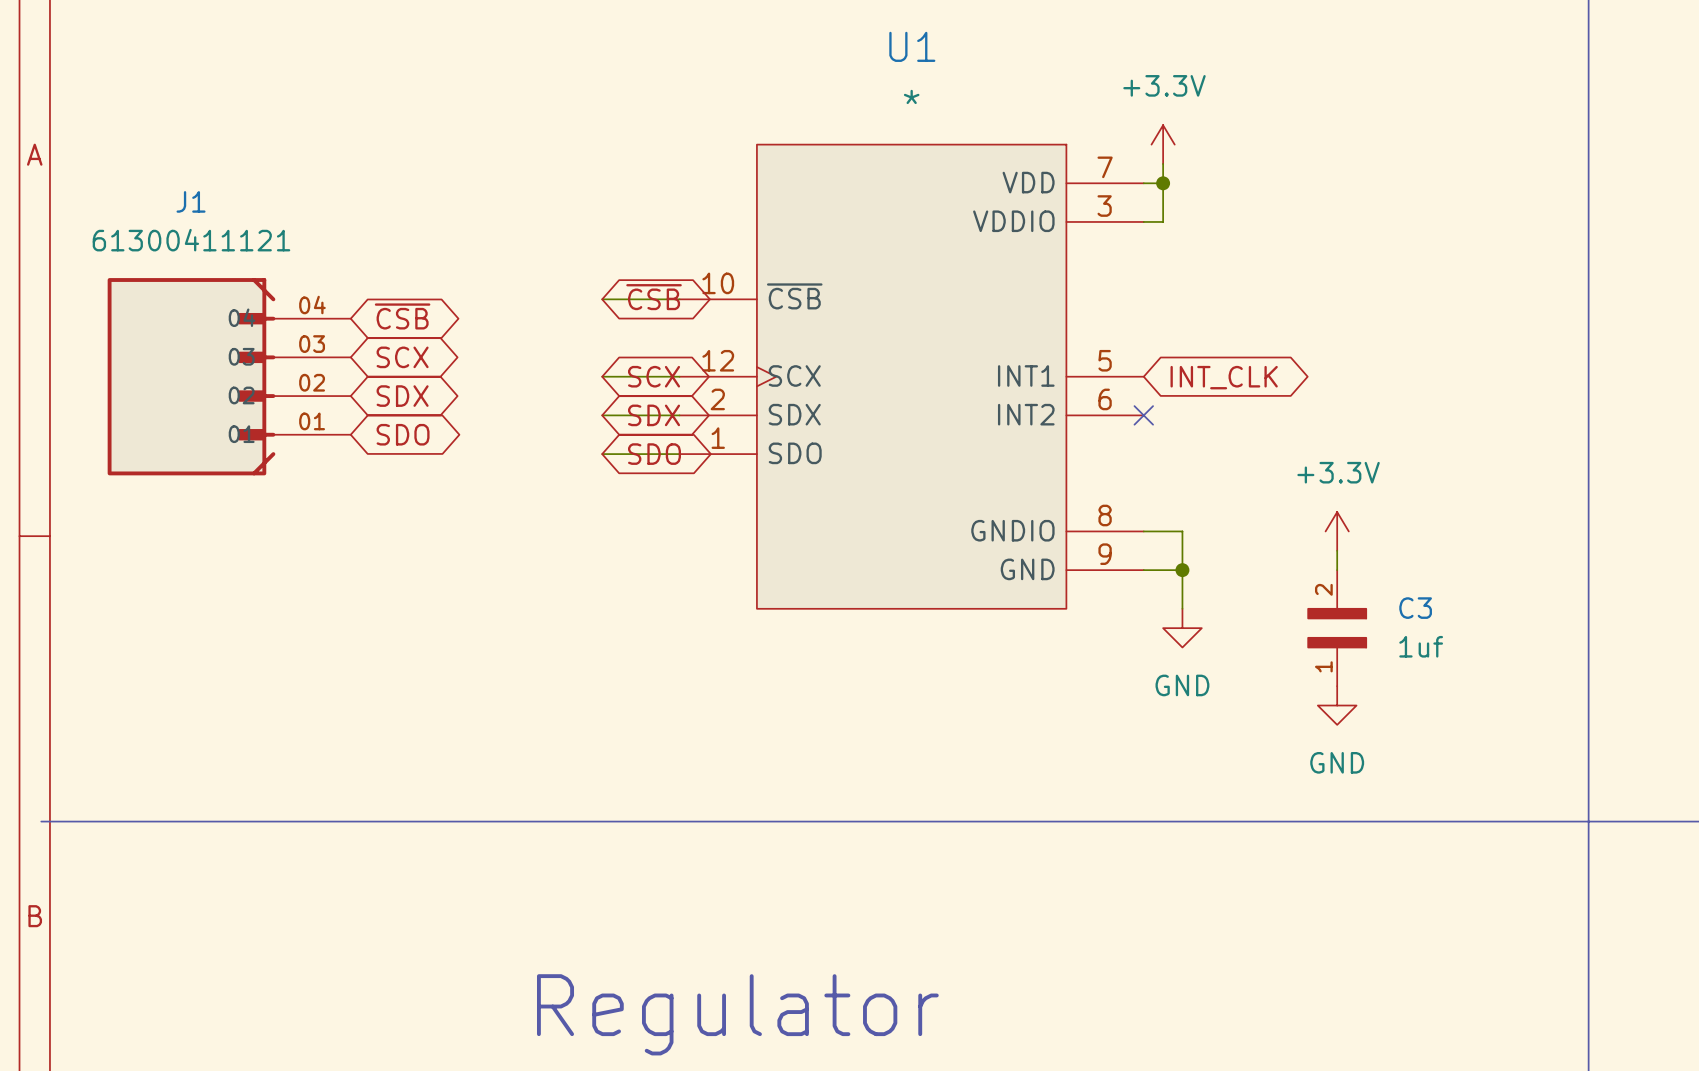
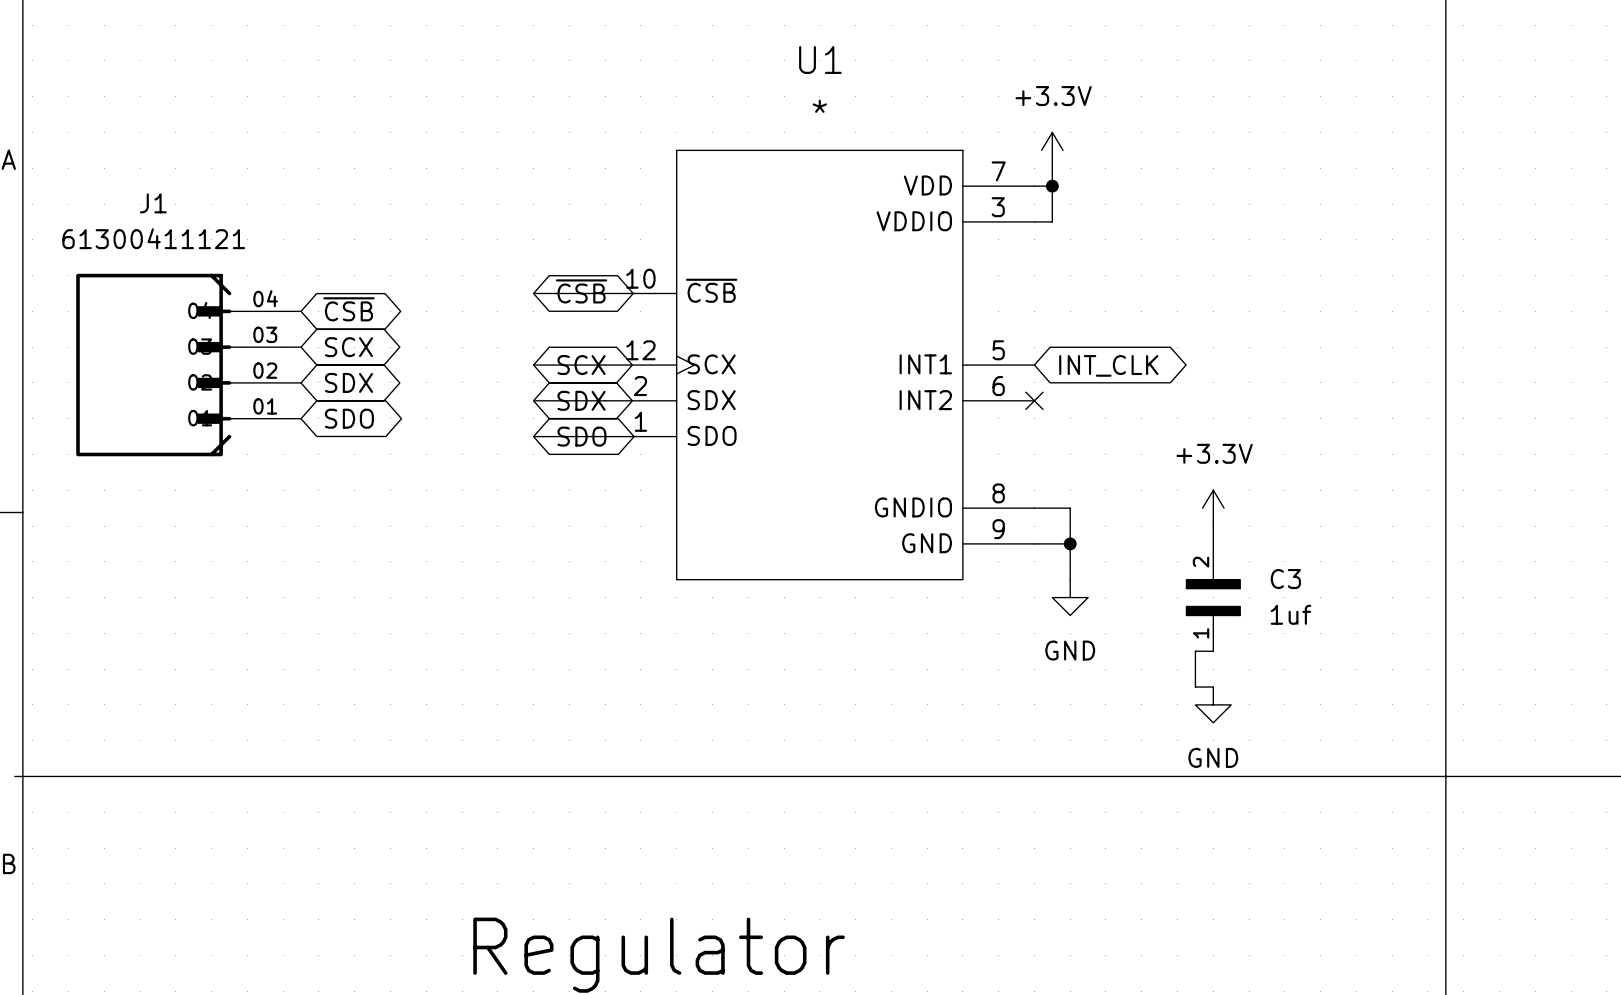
wire: none -> (1213, 651) (1195, 651) (1195, 687) (1213, 687)
power symbol position: GND (1337, 705) -> GND (1213, 704)

